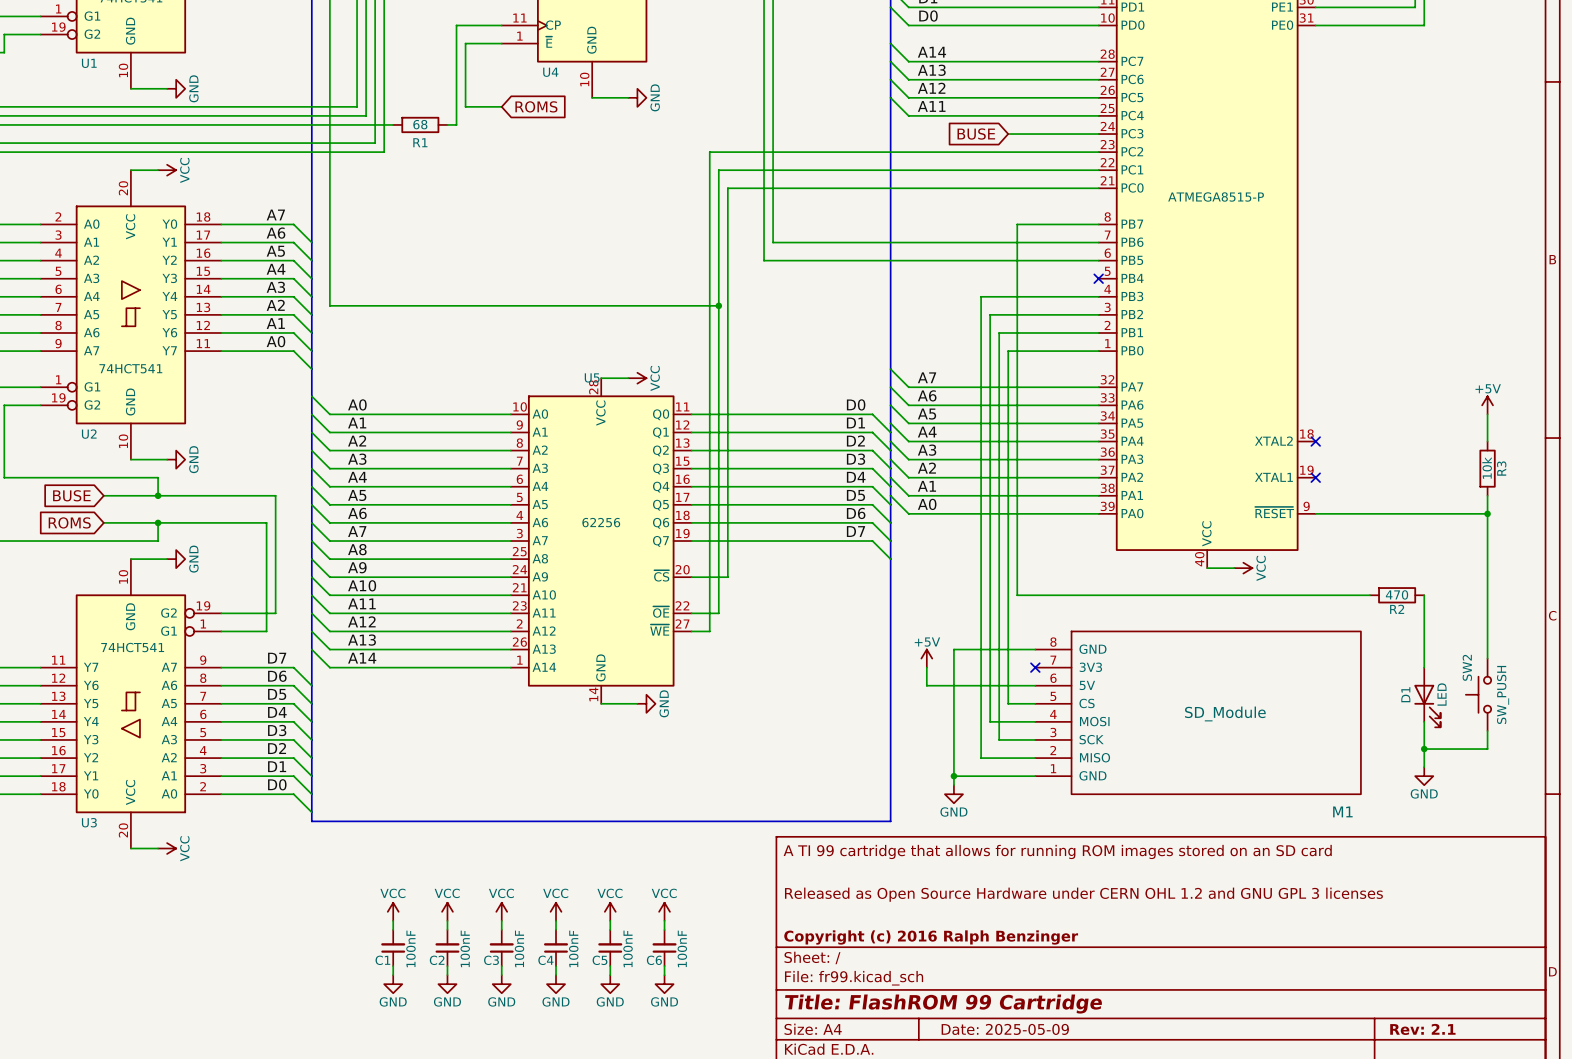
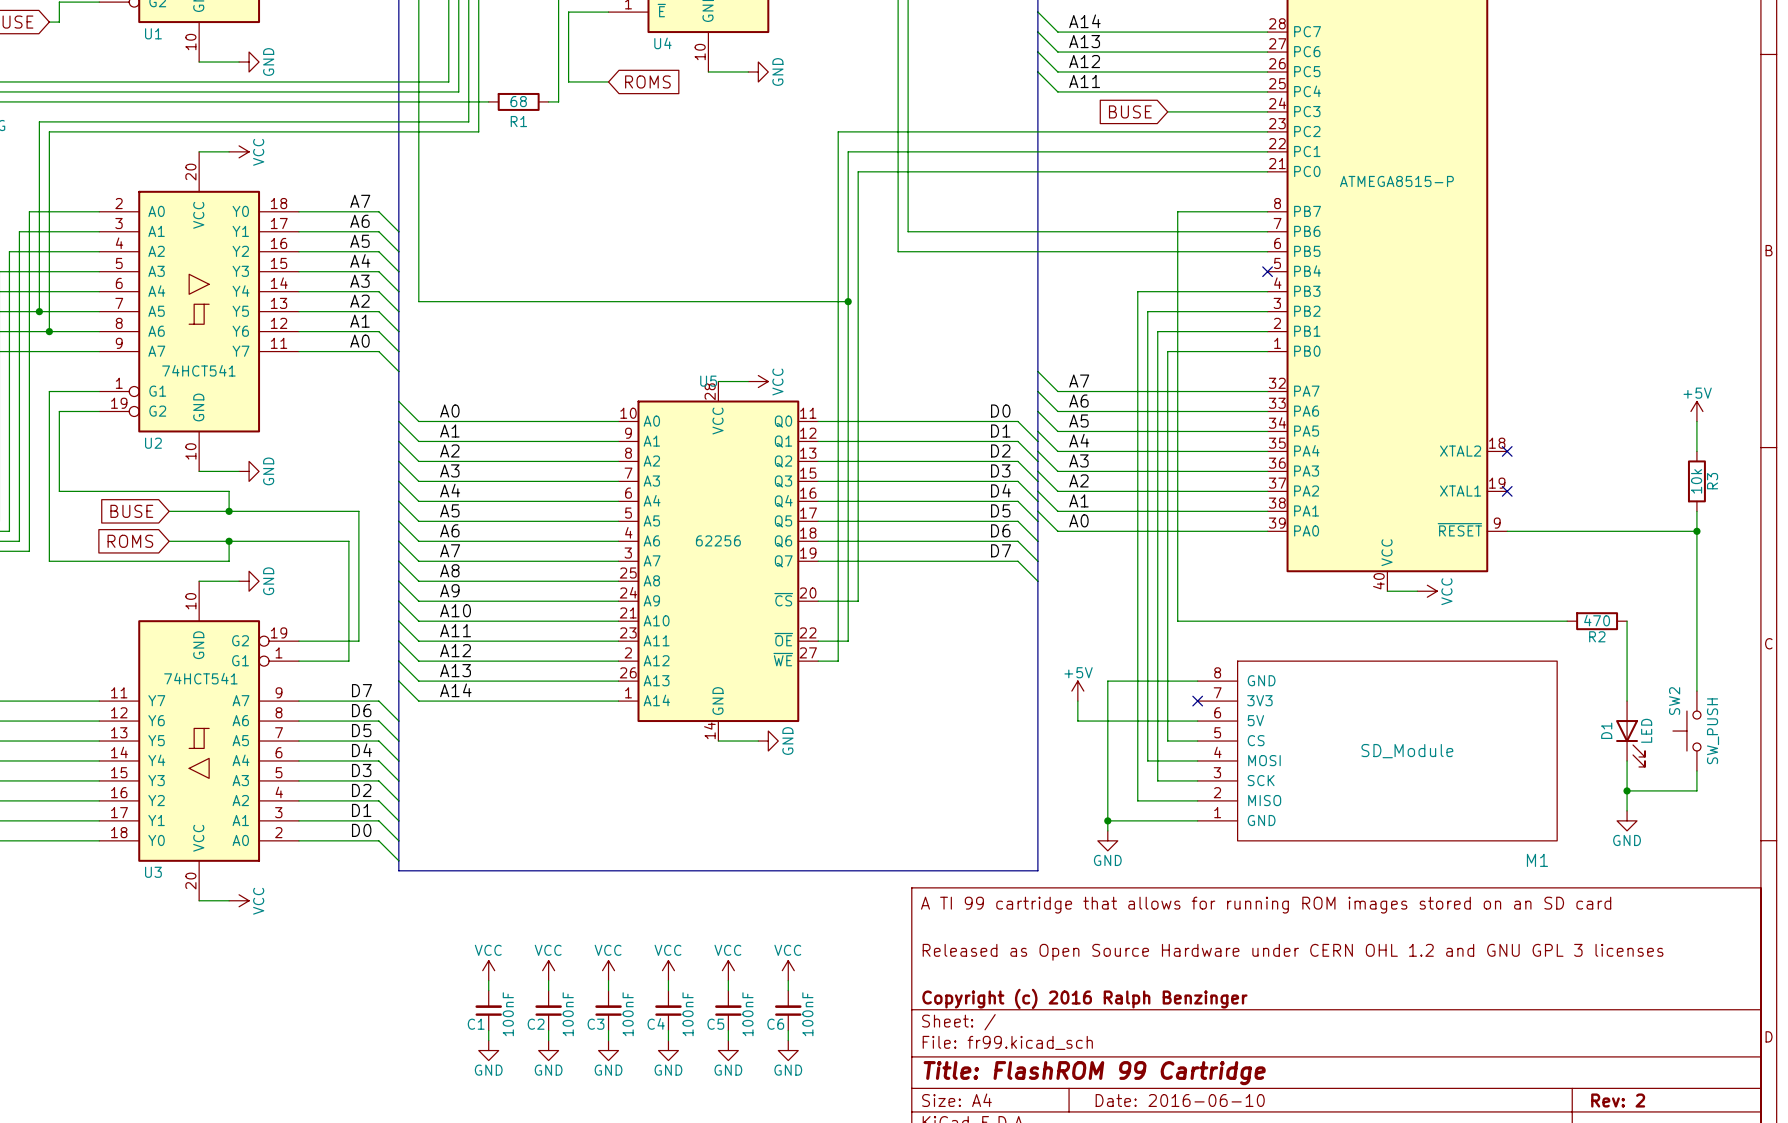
title block: Date: 2025-05-09 (1005, 1029) -> Date: 2016-06-10 (1180, 1100)
title block: Rev: 2.1 (1422, 1029) -> Rev: 2 (1618, 1100)

